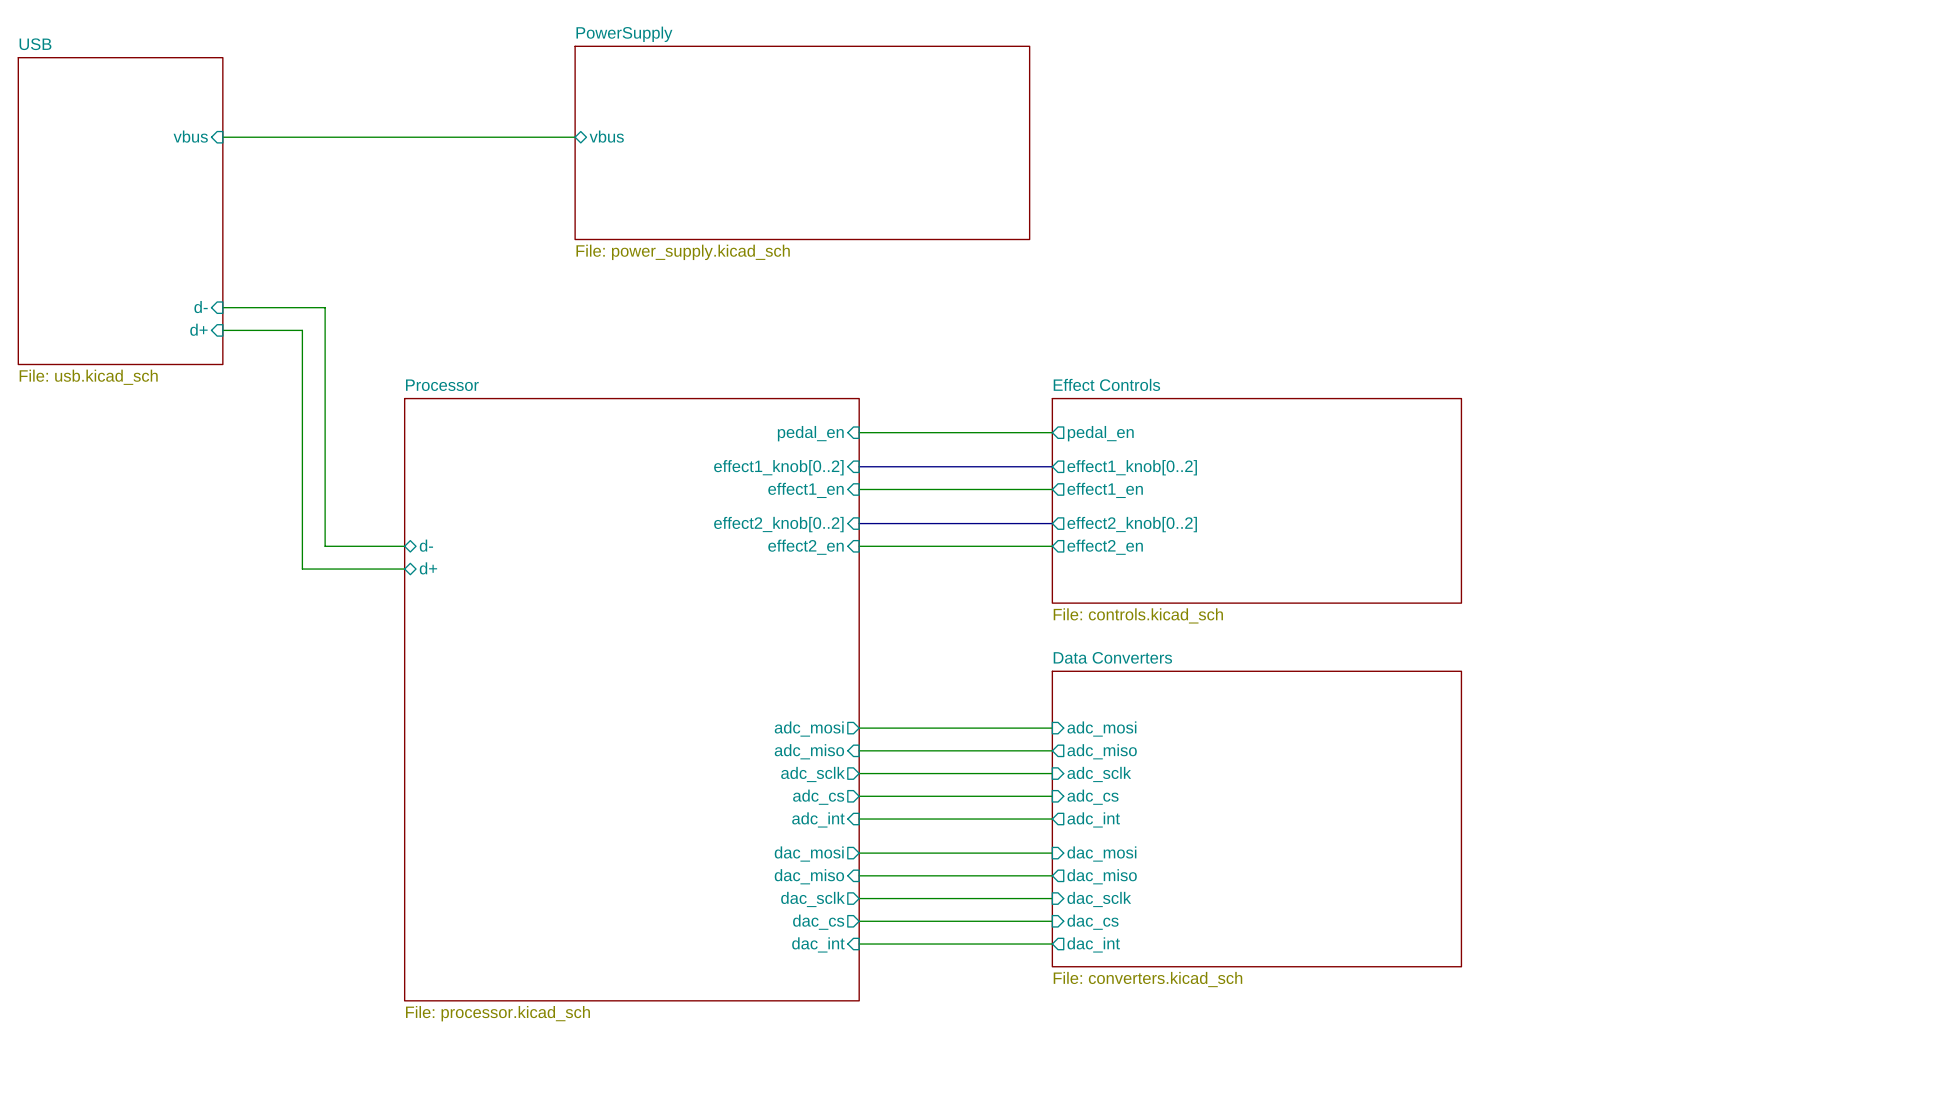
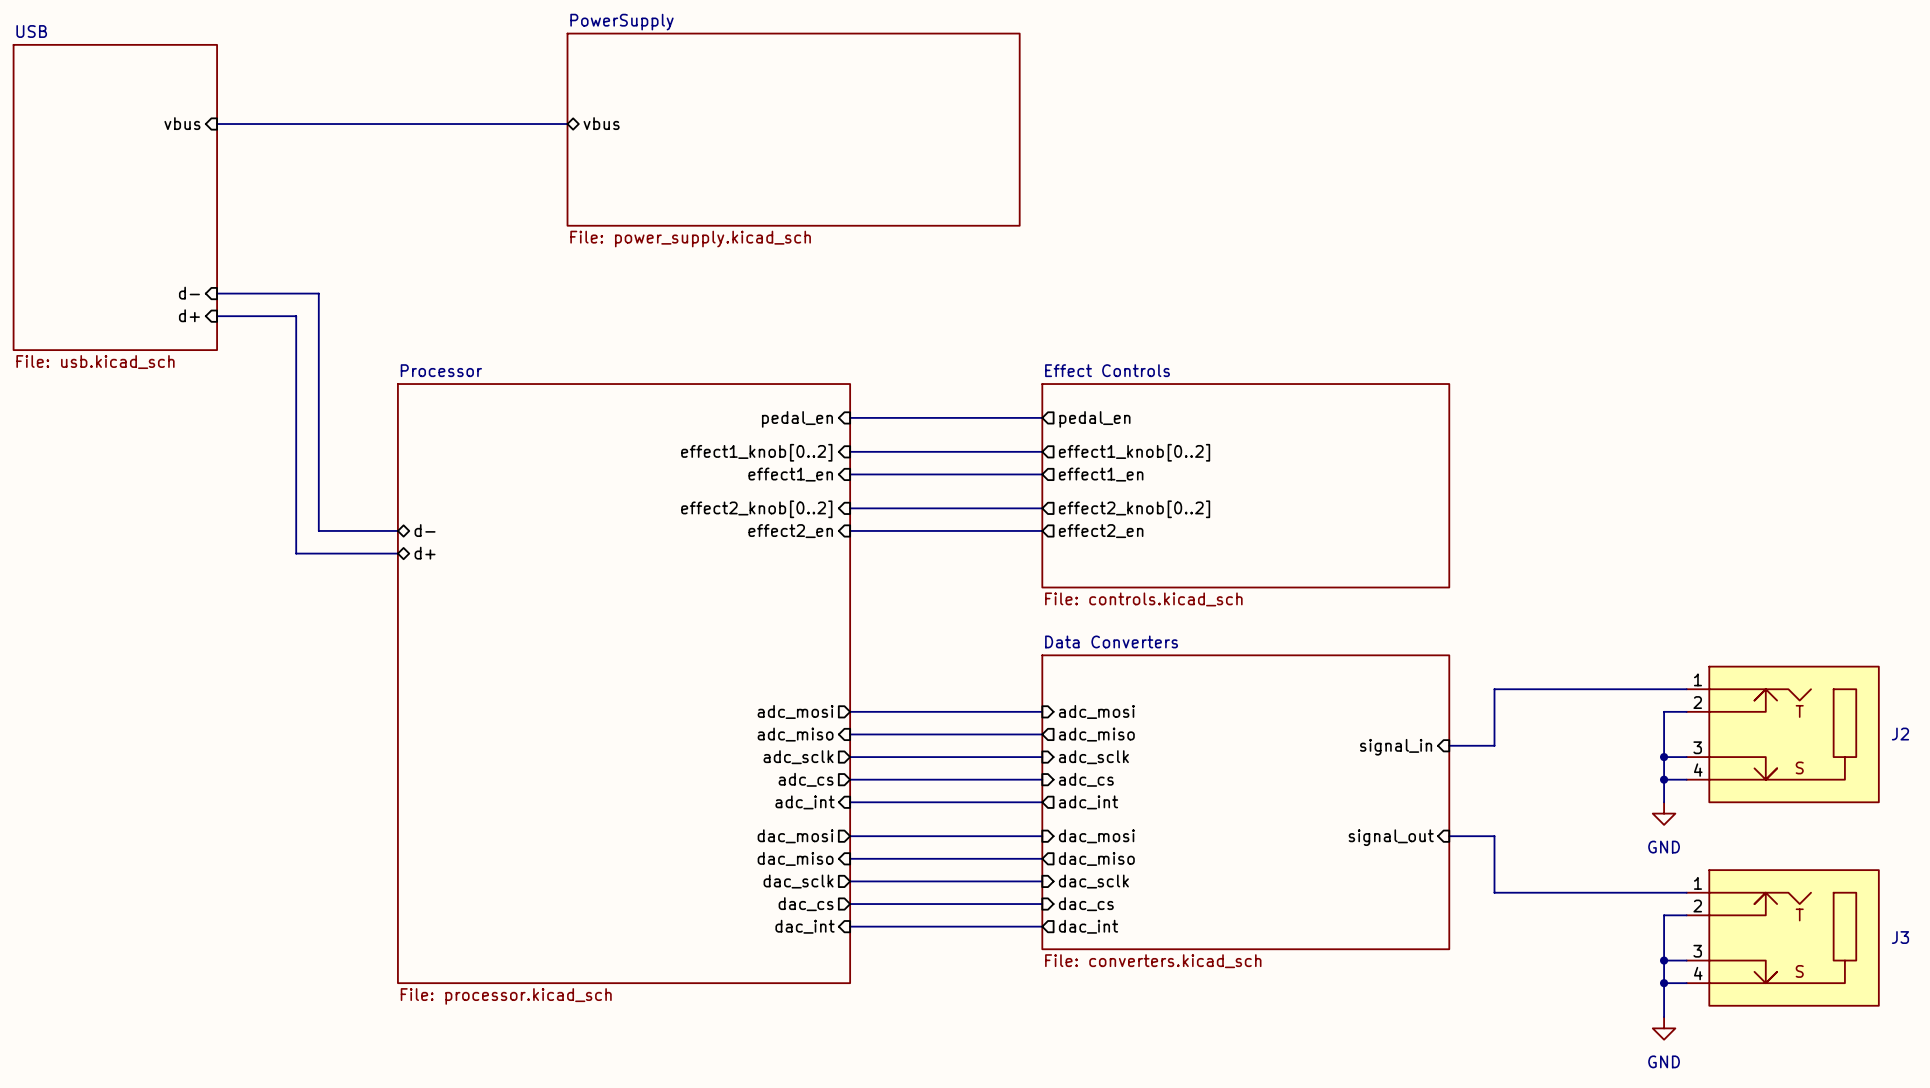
wire: none -> (1686, 689) (1494, 689) (1494, 745) (1449, 745)
wire: none -> (1686, 711) (1664, 711) (1664, 802)
J2: none -> (1782, 734)
sheet pin: none -> signal_in (1396, 747)
wire: none -> (1664, 757) (1686, 757)
junction: none -> (1664, 757)
wire: none -> (1664, 779) (1686, 779)
junction: none -> (1664, 779)
power symbol: none -> GND (1664, 813)
wire: none -> (1449, 836) (1494, 836) (1494, 892) (1686, 892)
sheet pin: none -> signal_out (1391, 837)
wire: none -> (1686, 915) (1664, 915) (1664, 1017)
J3: none -> (1782, 937)
wire: none -> (1664, 960) (1686, 960)
junction: none -> (1664, 960)
wire: none -> (1664, 983) (1686, 983)
junction: none -> (1664, 983)
power symbol: none -> GND (1664, 1028)

